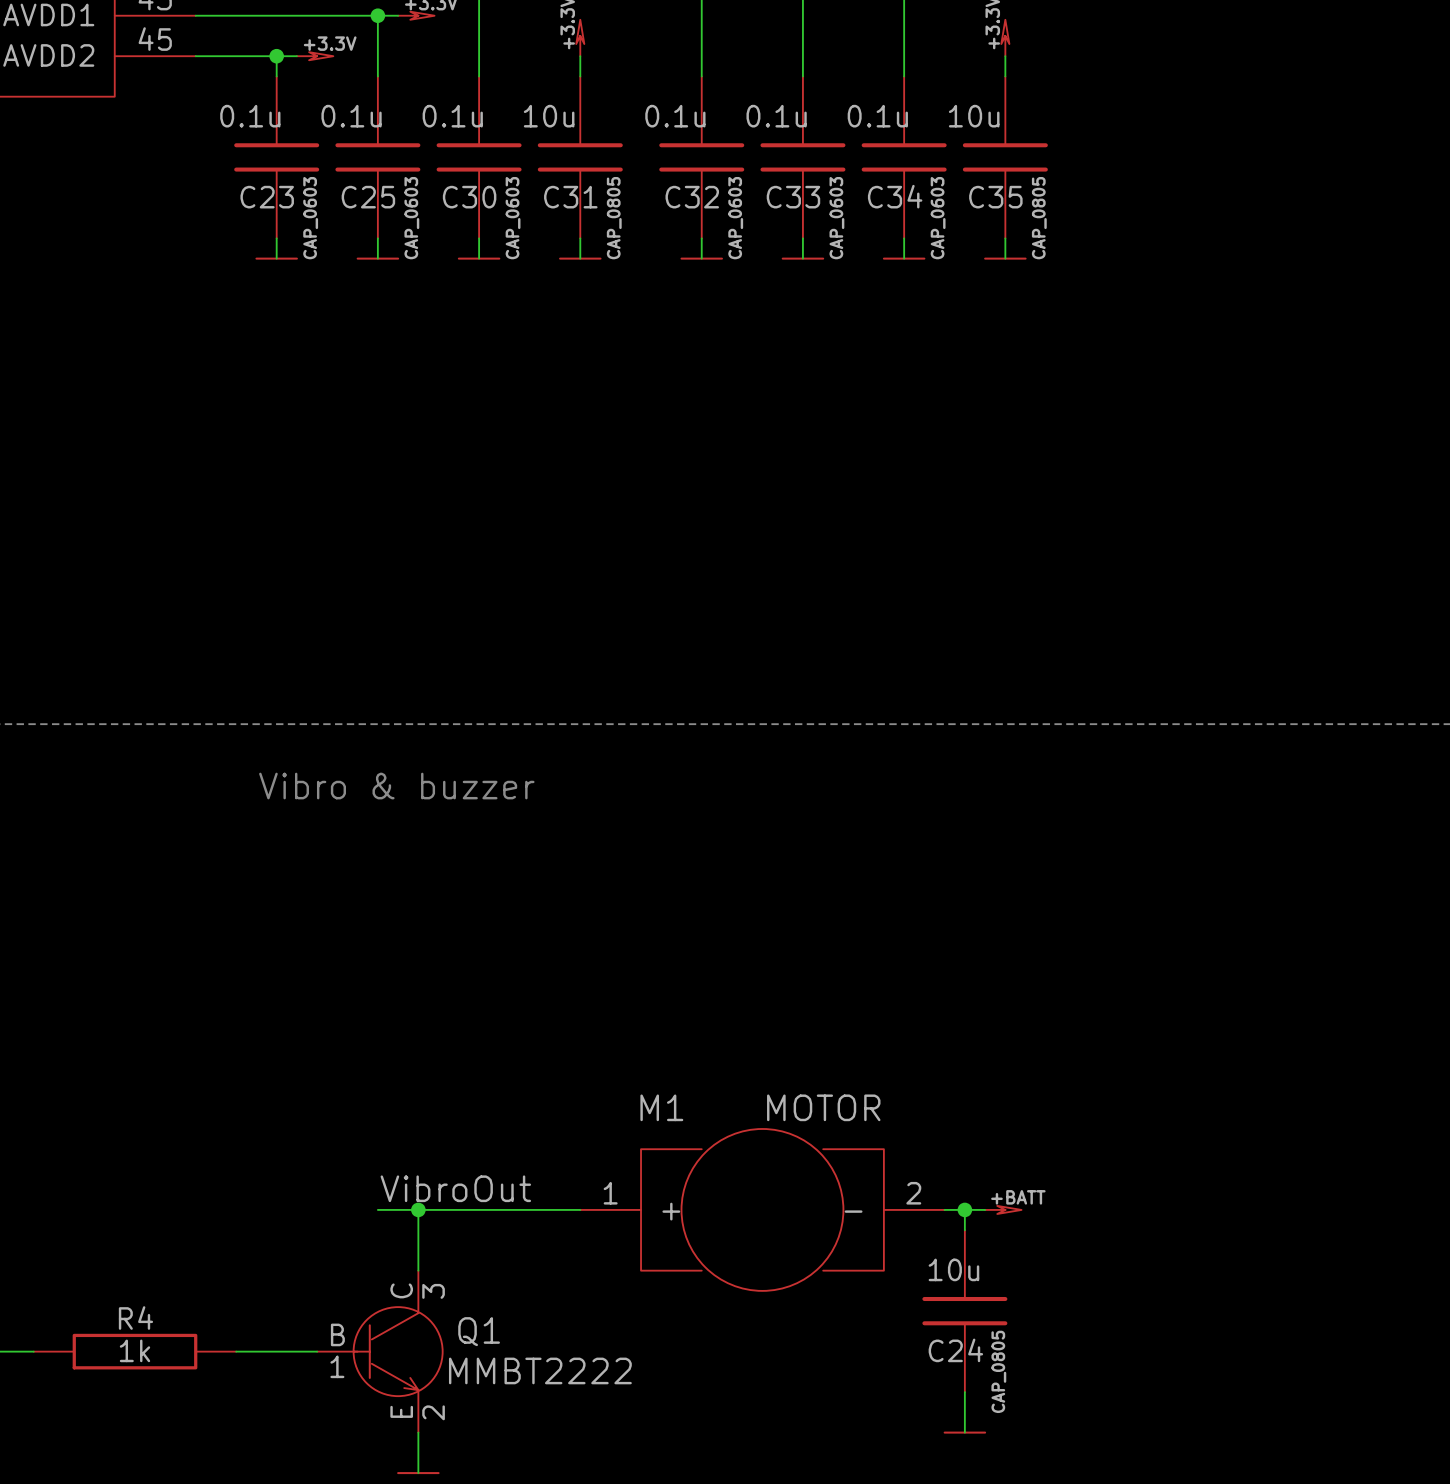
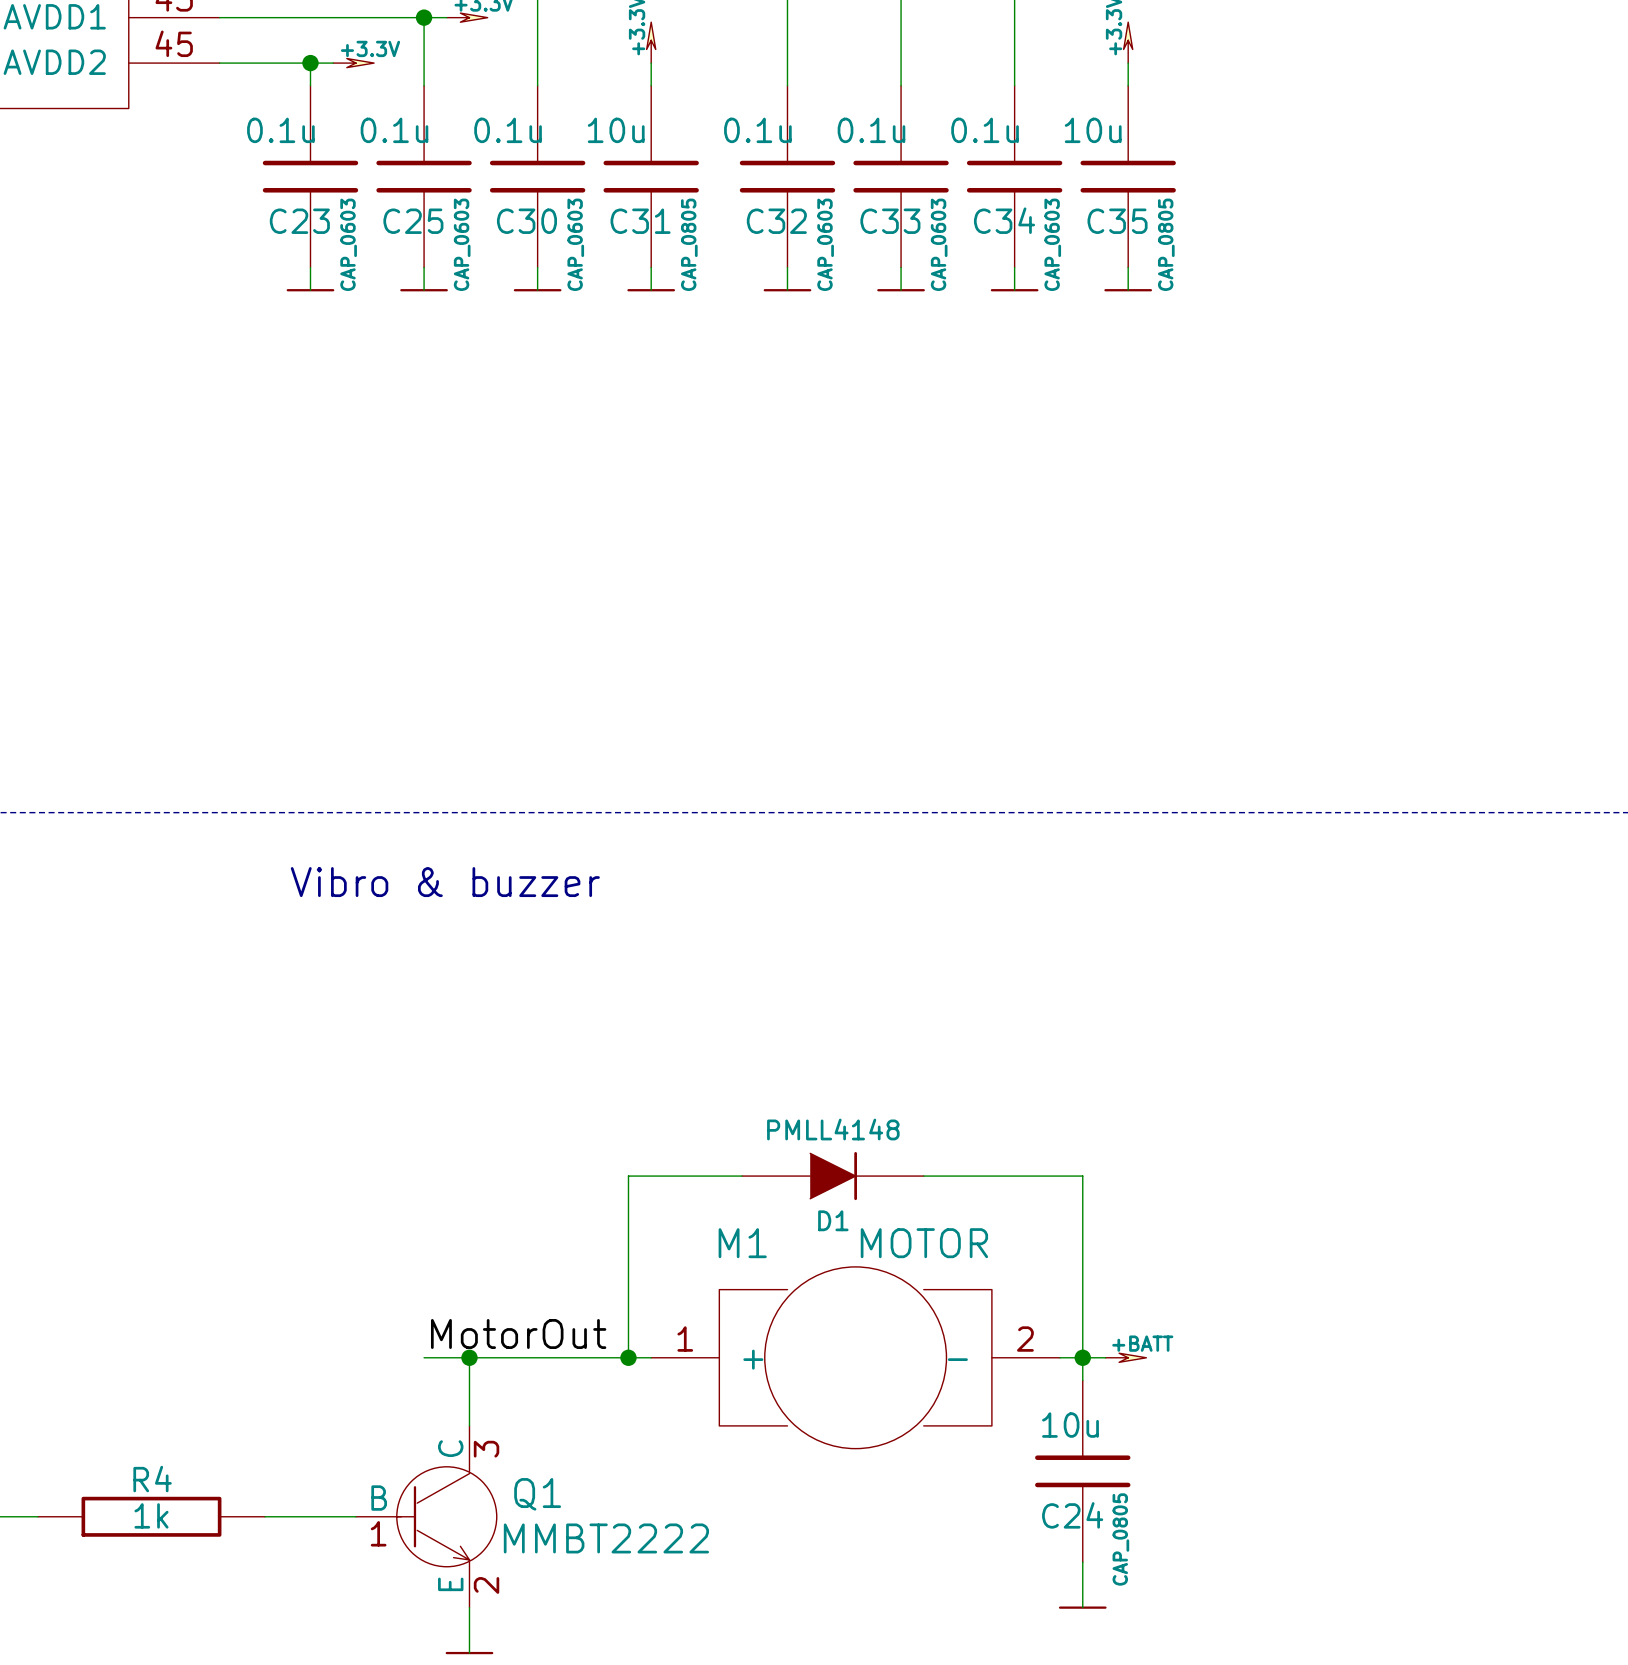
wire: none -> (742, 1176) (628, 1176) (628, 1357)
D1: none -> PMLL4148 (832, 1176)
wire: none -> (923, 1176) (1082, 1176) (1082, 1357)
label: VibroOut (455, 1188) -> MotorOut (518, 1333)
junction: none -> (628, 1357)

